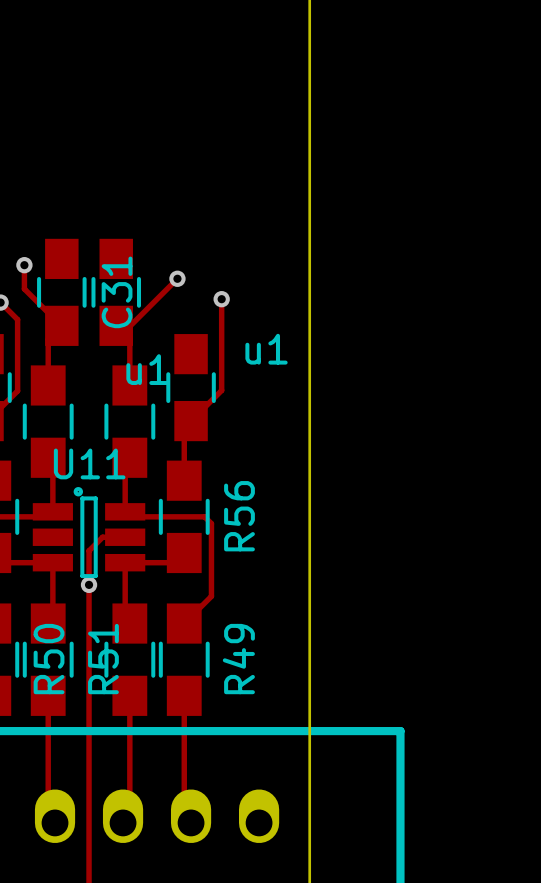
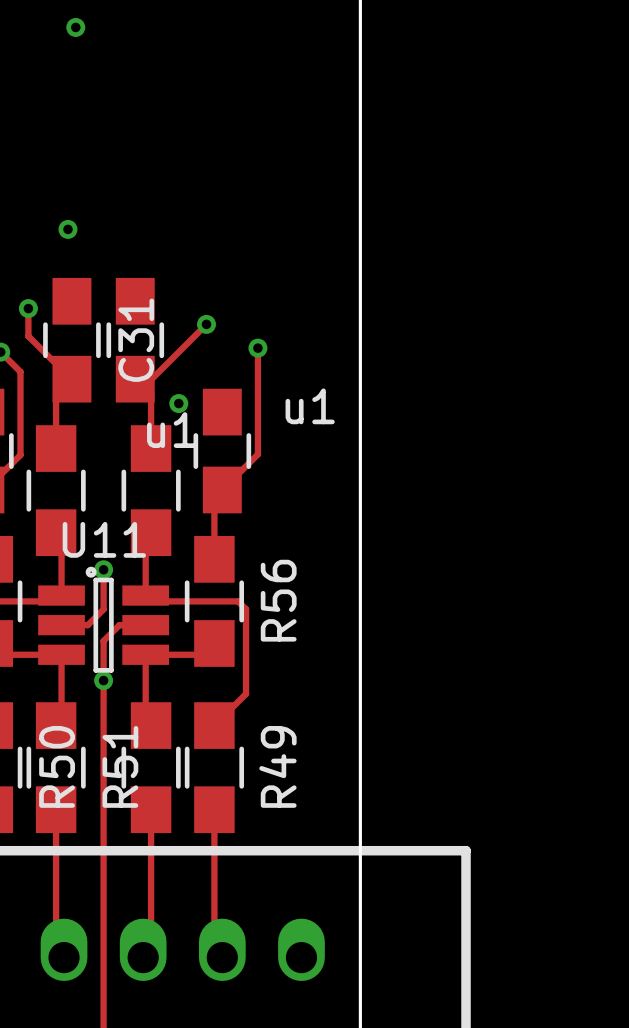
via: none -> (75, 27)
via: none -> (67, 229)
via: none -> (178, 403)
track: none -> (103, 569) (103, 609) (87, 625) (61, 625)
via: none -> (103, 569)

